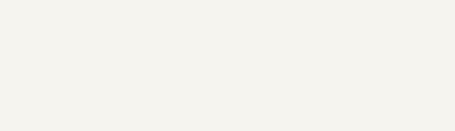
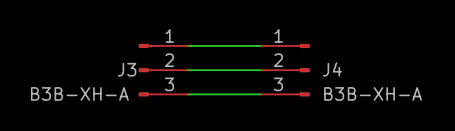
wire: none -> (187, 45) (260, 45)
J3: none -> B3B-XH-A (163, 70)
wire: none -> (187, 70) (260, 70)
J4: none -> B3B-XH-A (285, 70)
wire: none -> (187, 94) (260, 94)

